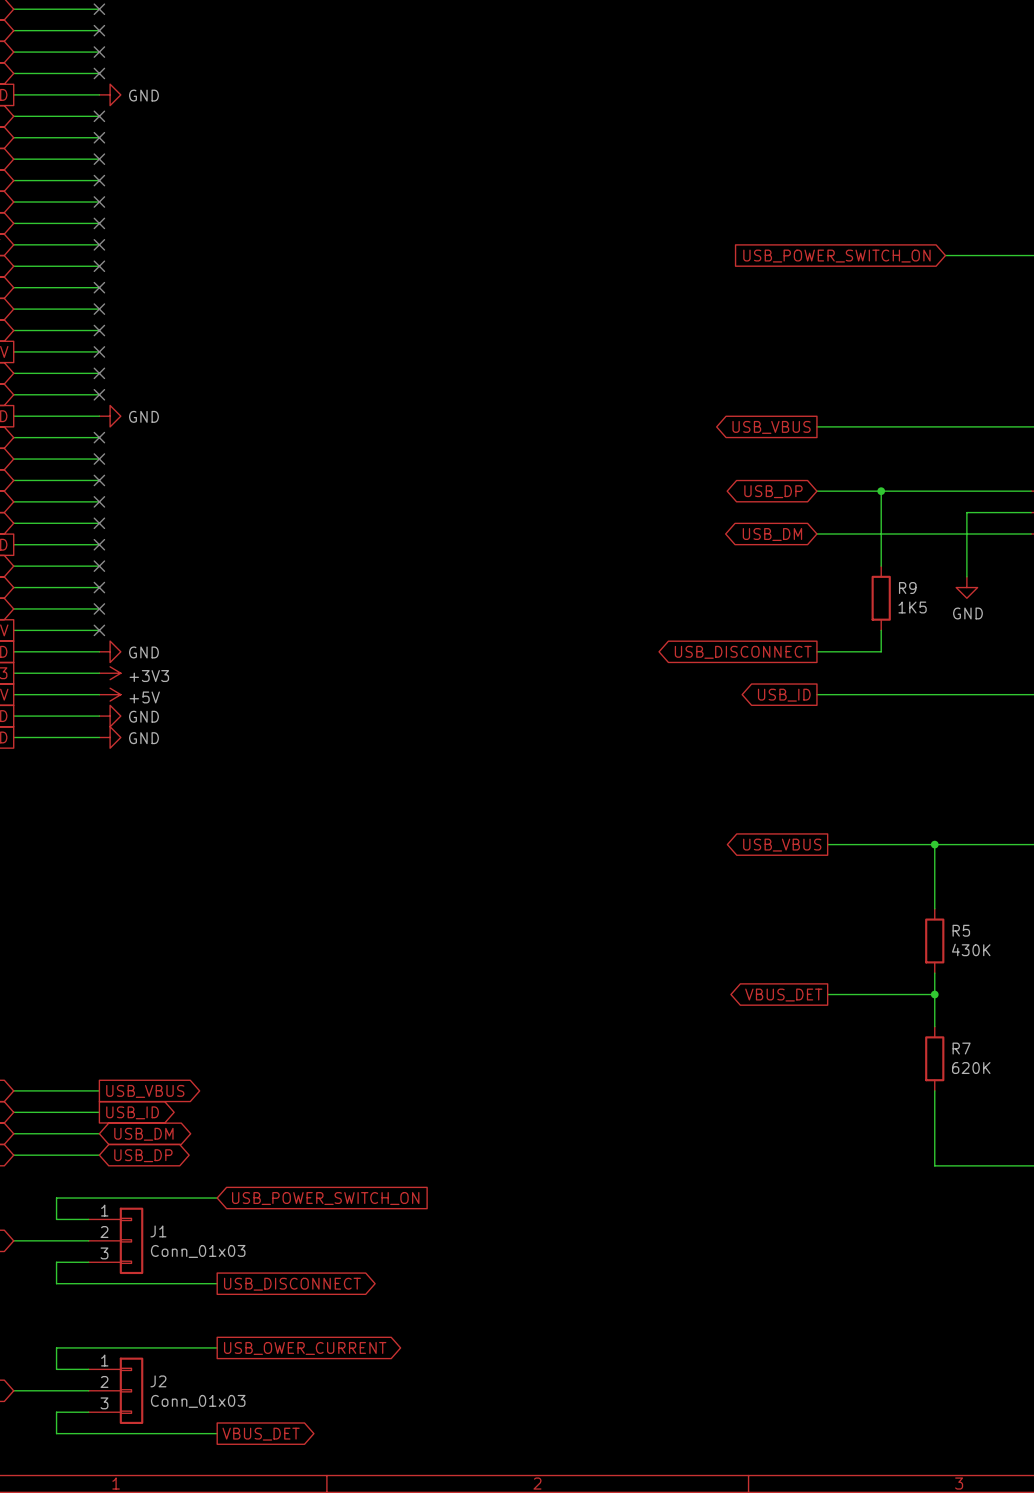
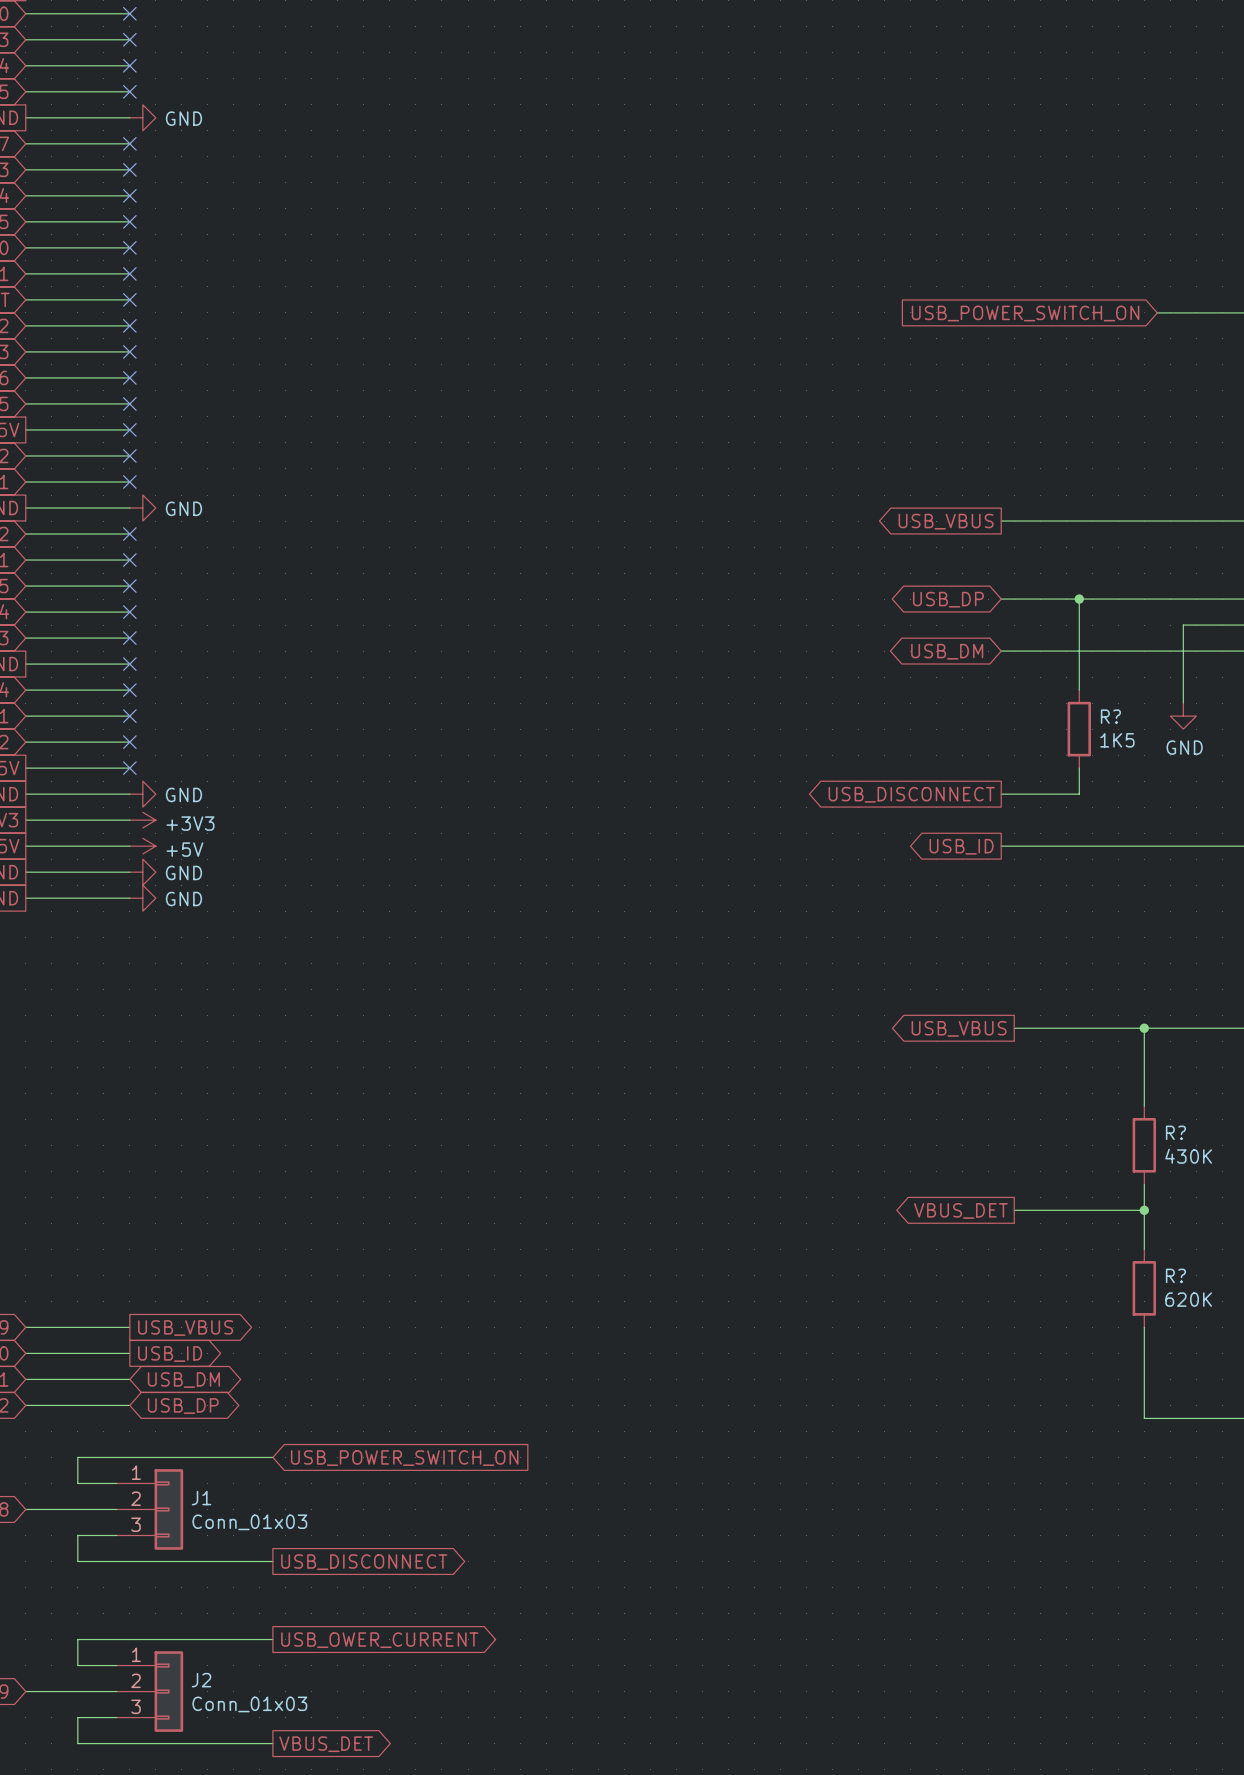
R9 name: R9 (907, 588) -> R? (1110, 716)
R5 name: R5 (961, 930) -> R? (1175, 1132)
R7 name: R7 (961, 1048) -> R? (1175, 1275)

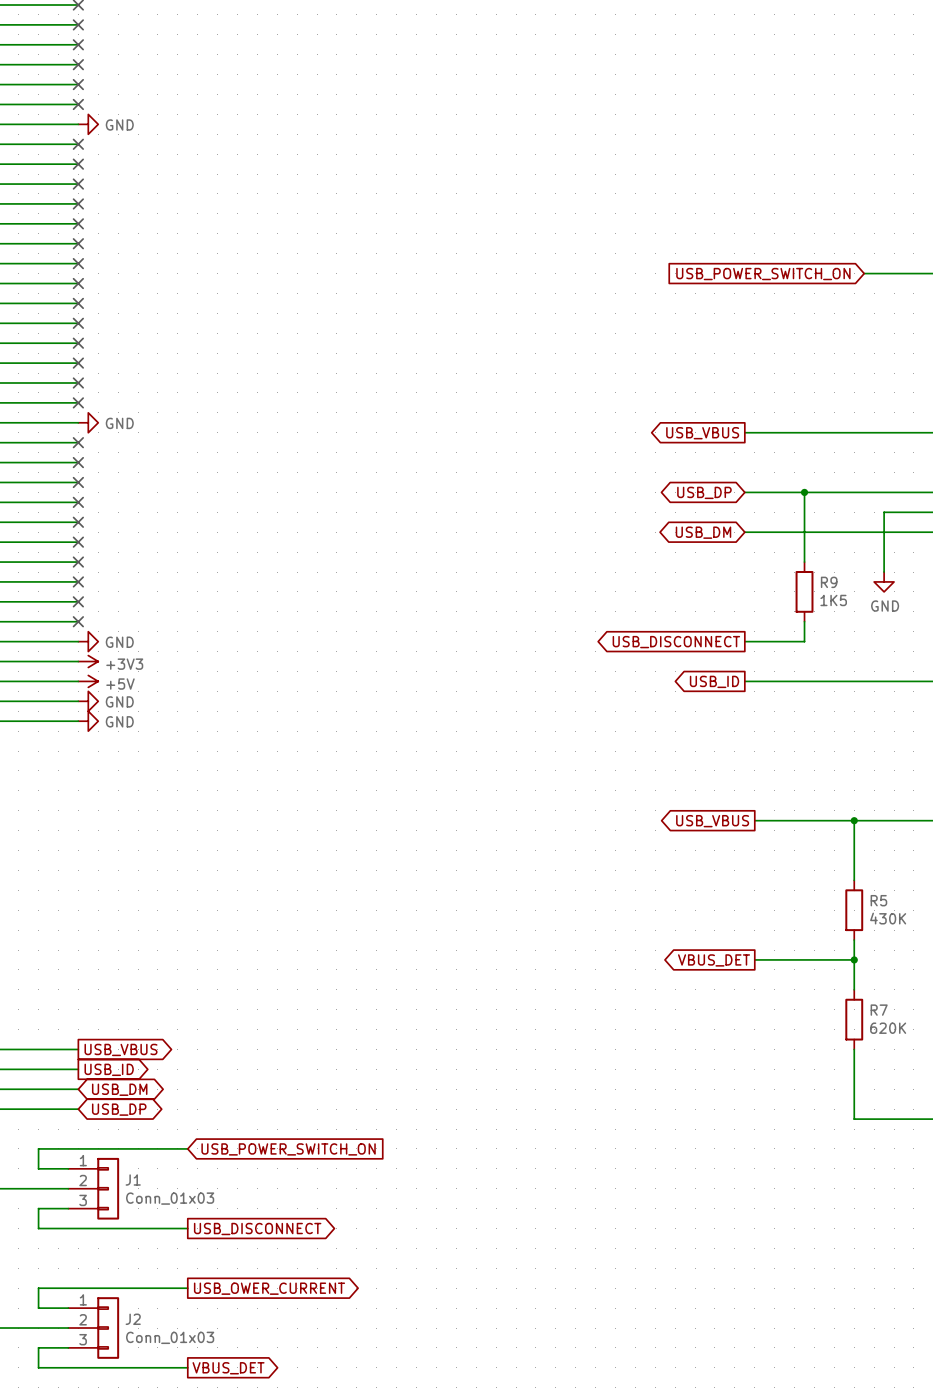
R? name: R? (1110, 716) -> R9 (829, 582)
R? name: R? (1175, 1132) -> R5 (878, 900)
R? name: R? (1175, 1275) -> R7 (879, 1010)

